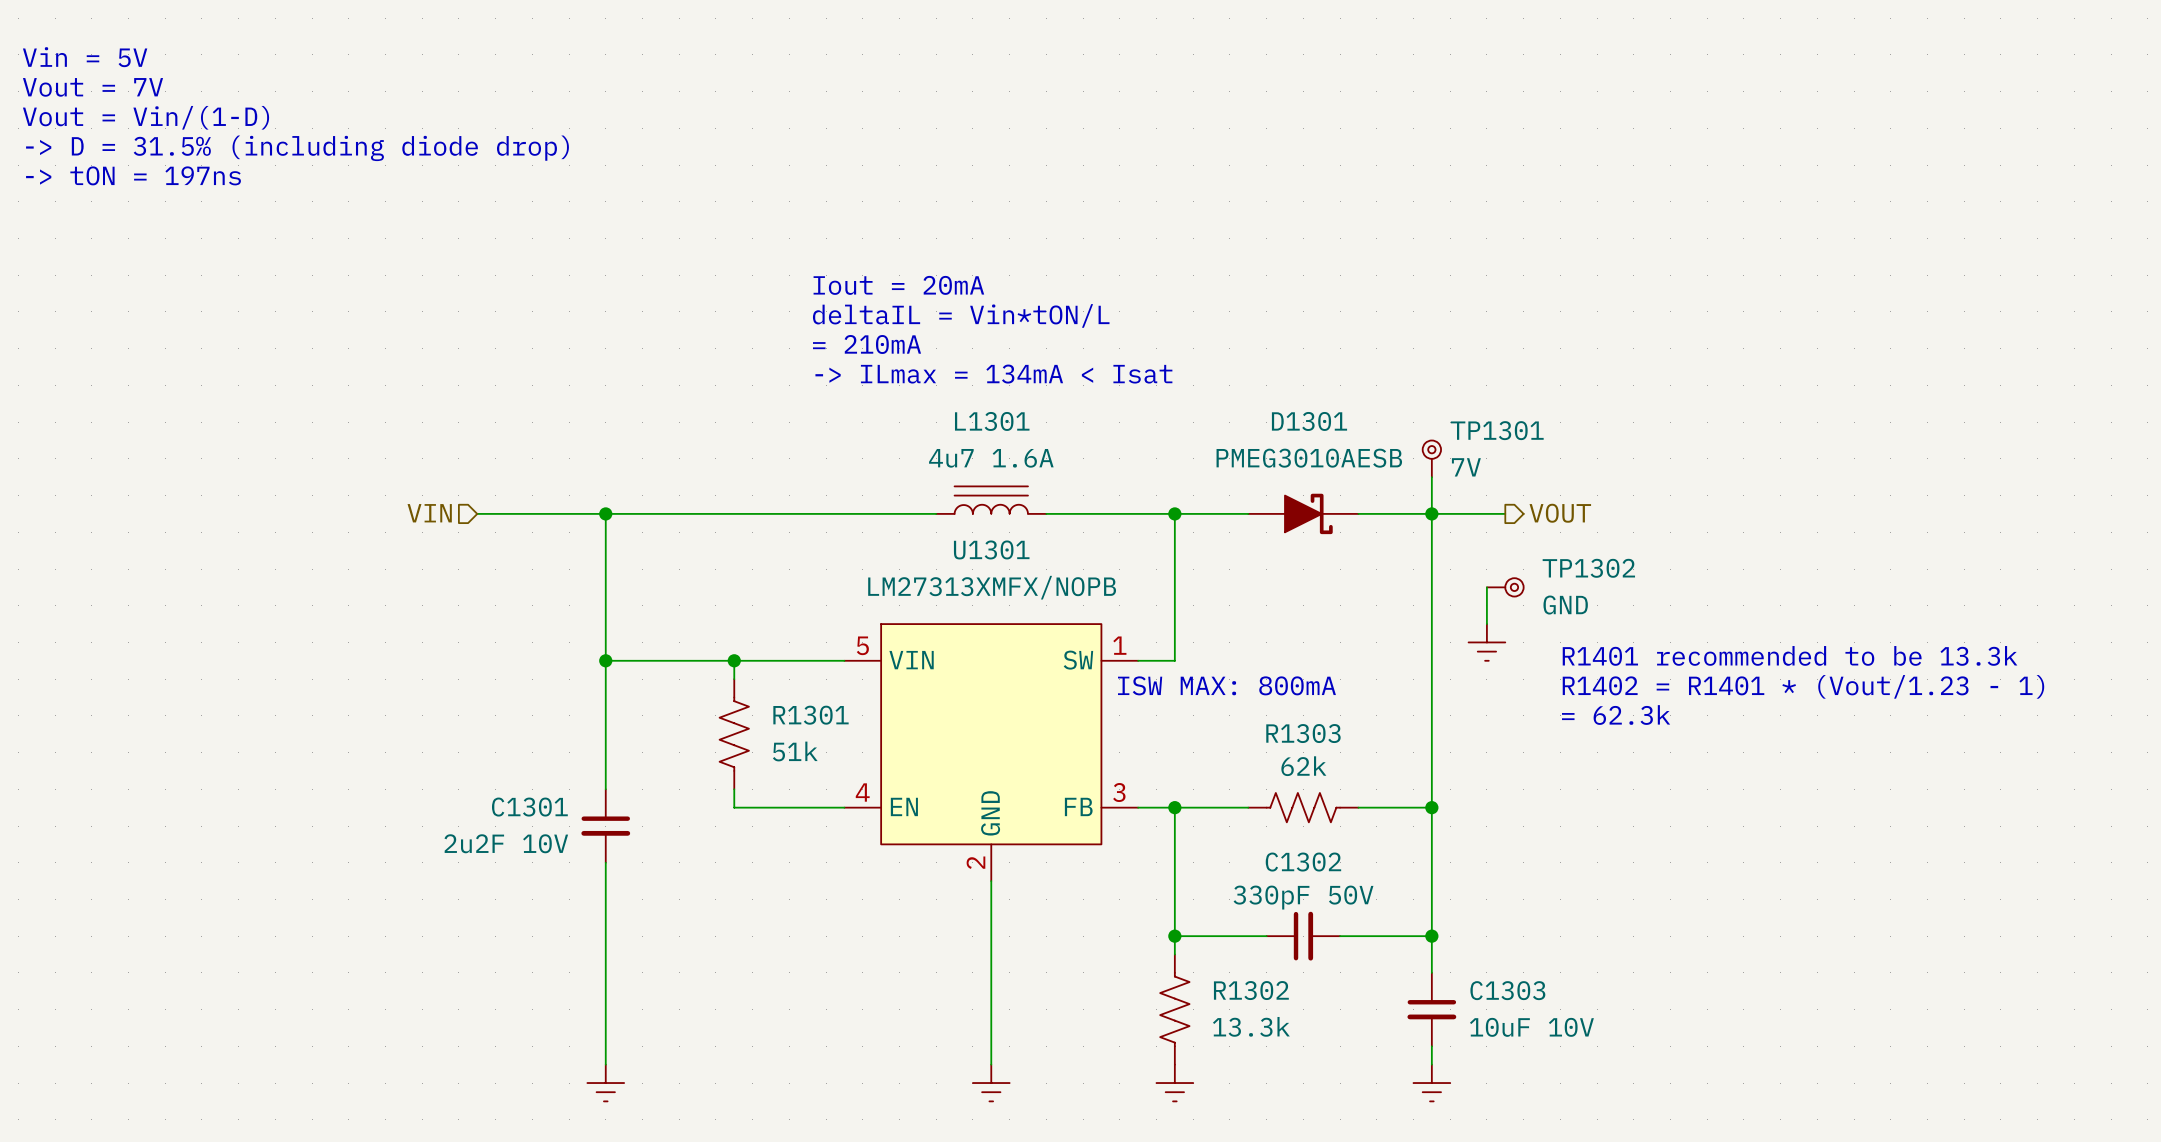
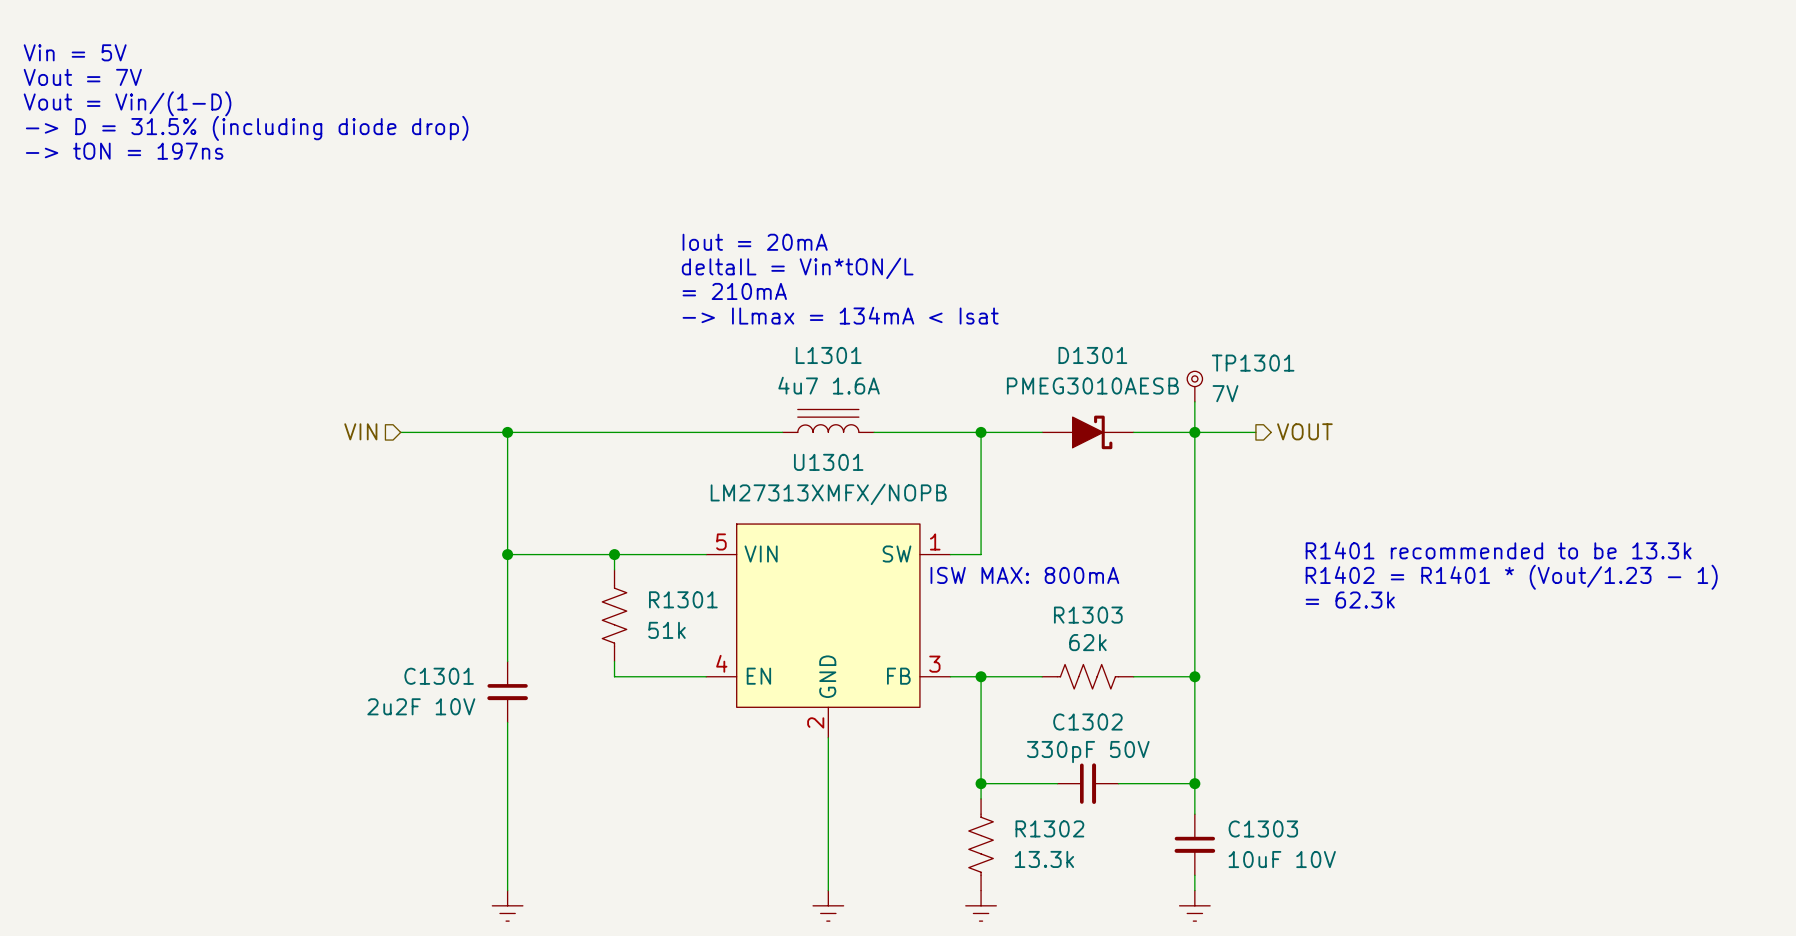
wire: (1486, 587) (1486, 624) -> none
TP1302: GND (1505, 587) -> none
power symbol: (1486, 642) -> none

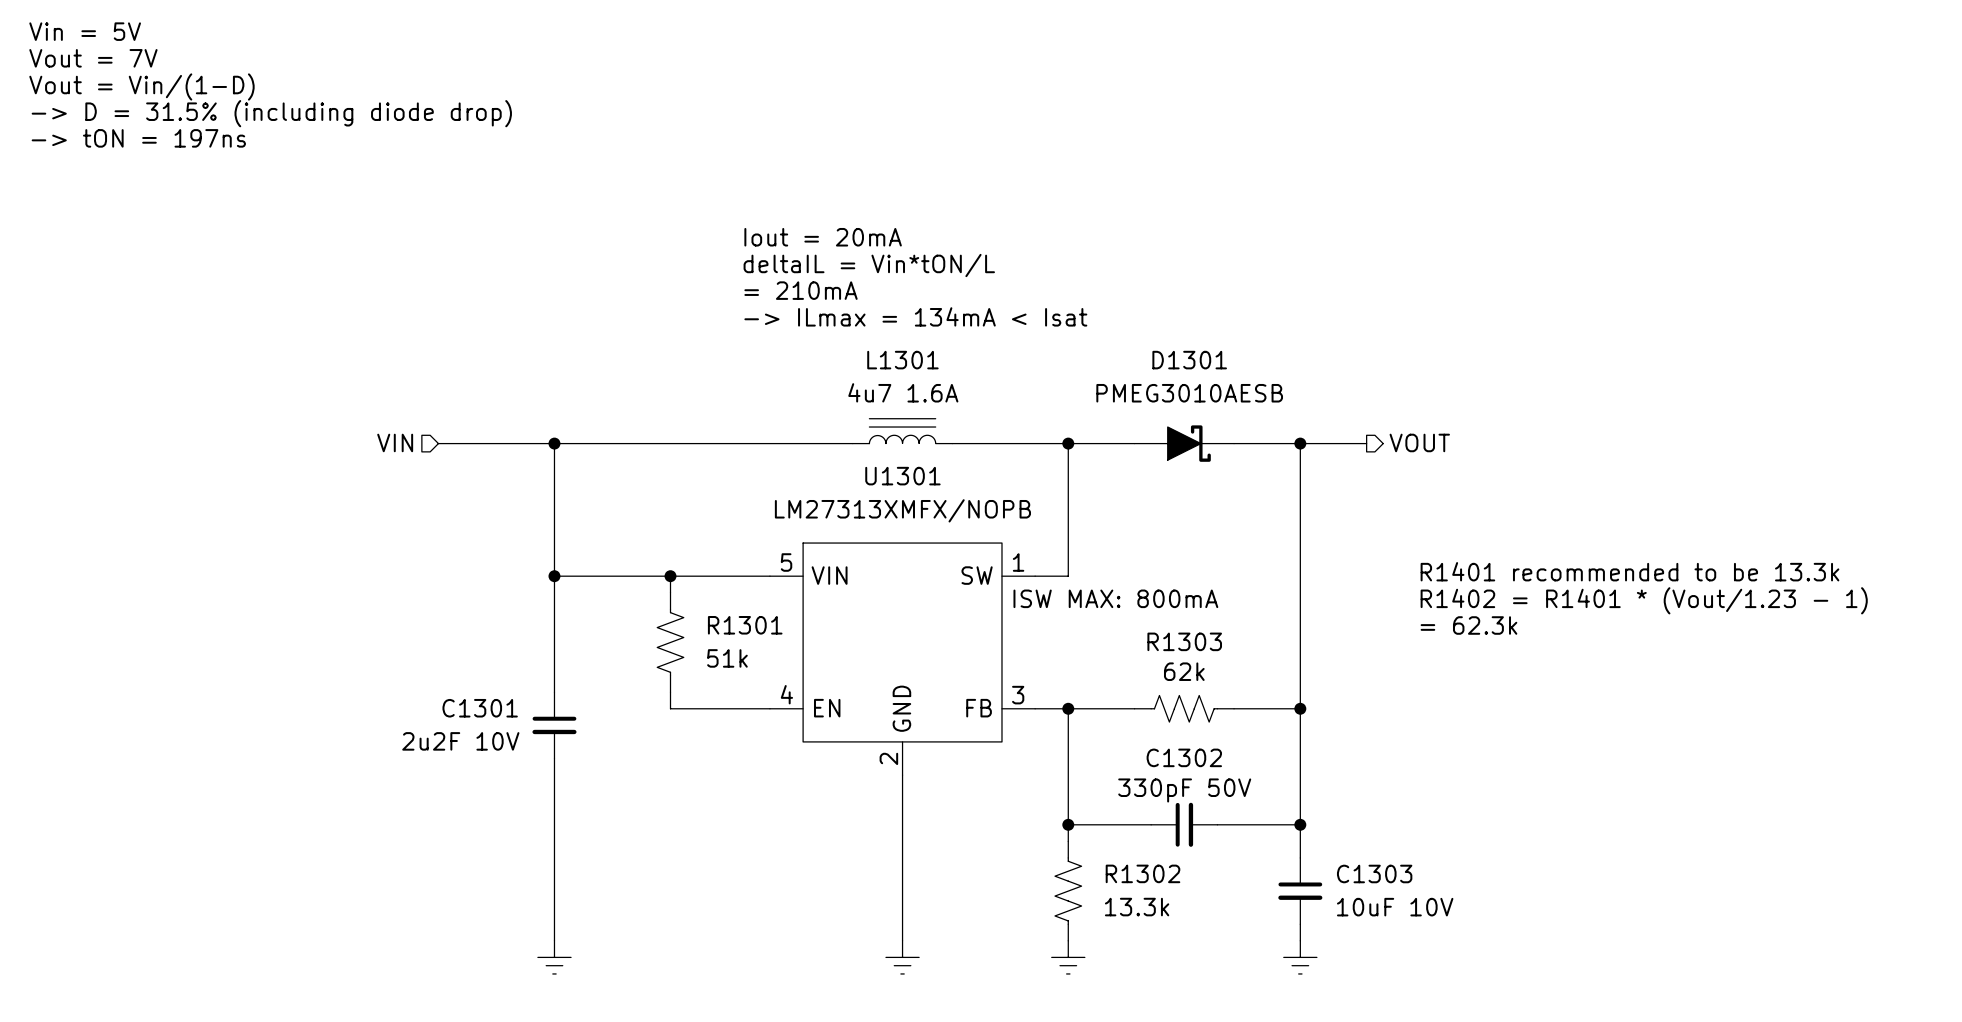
TP1301: 7V (1194, 386) -> none
wire: (1194, 401) (1194, 432) -> none

